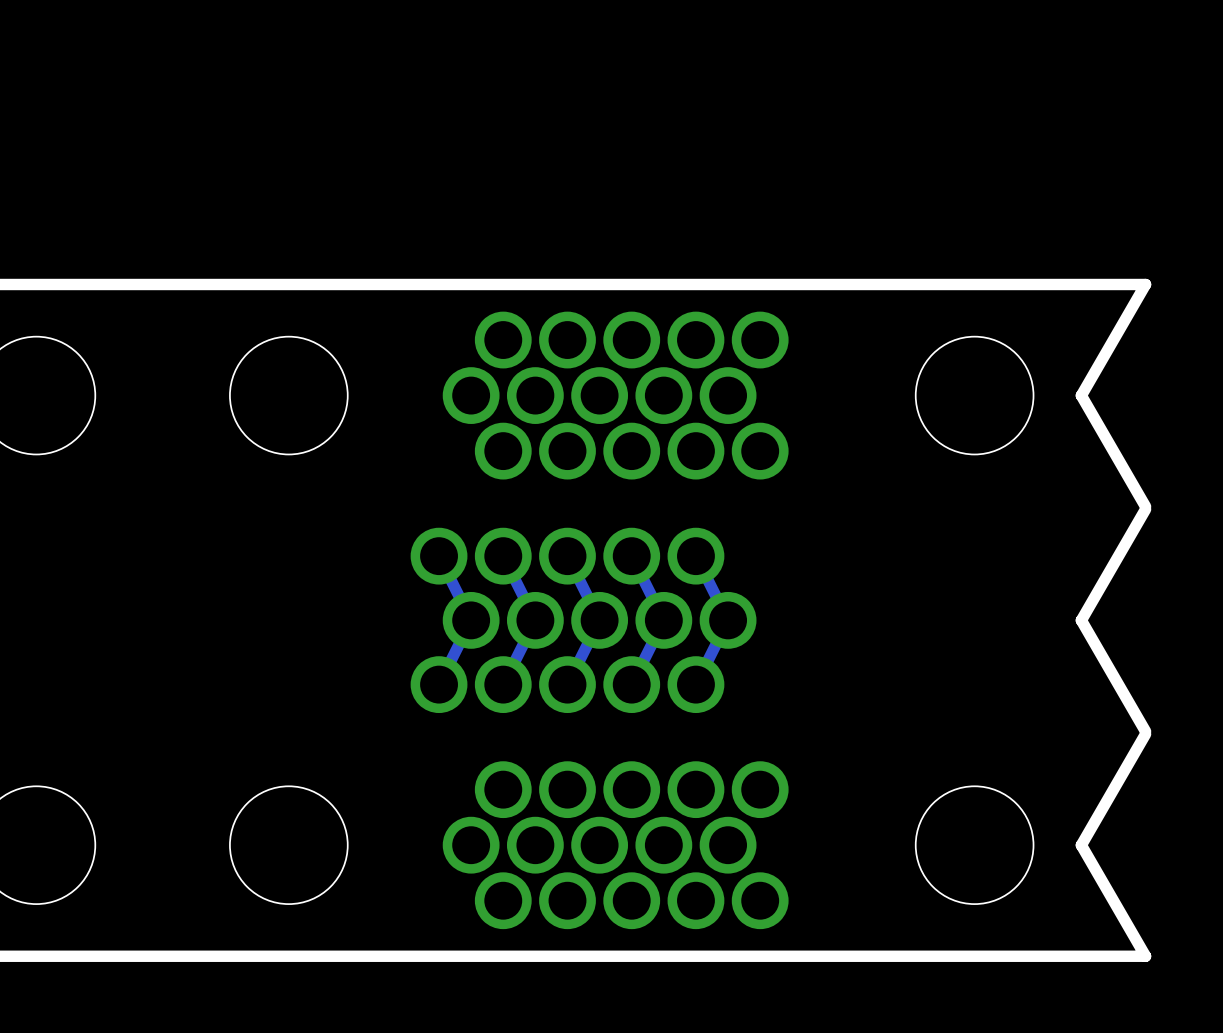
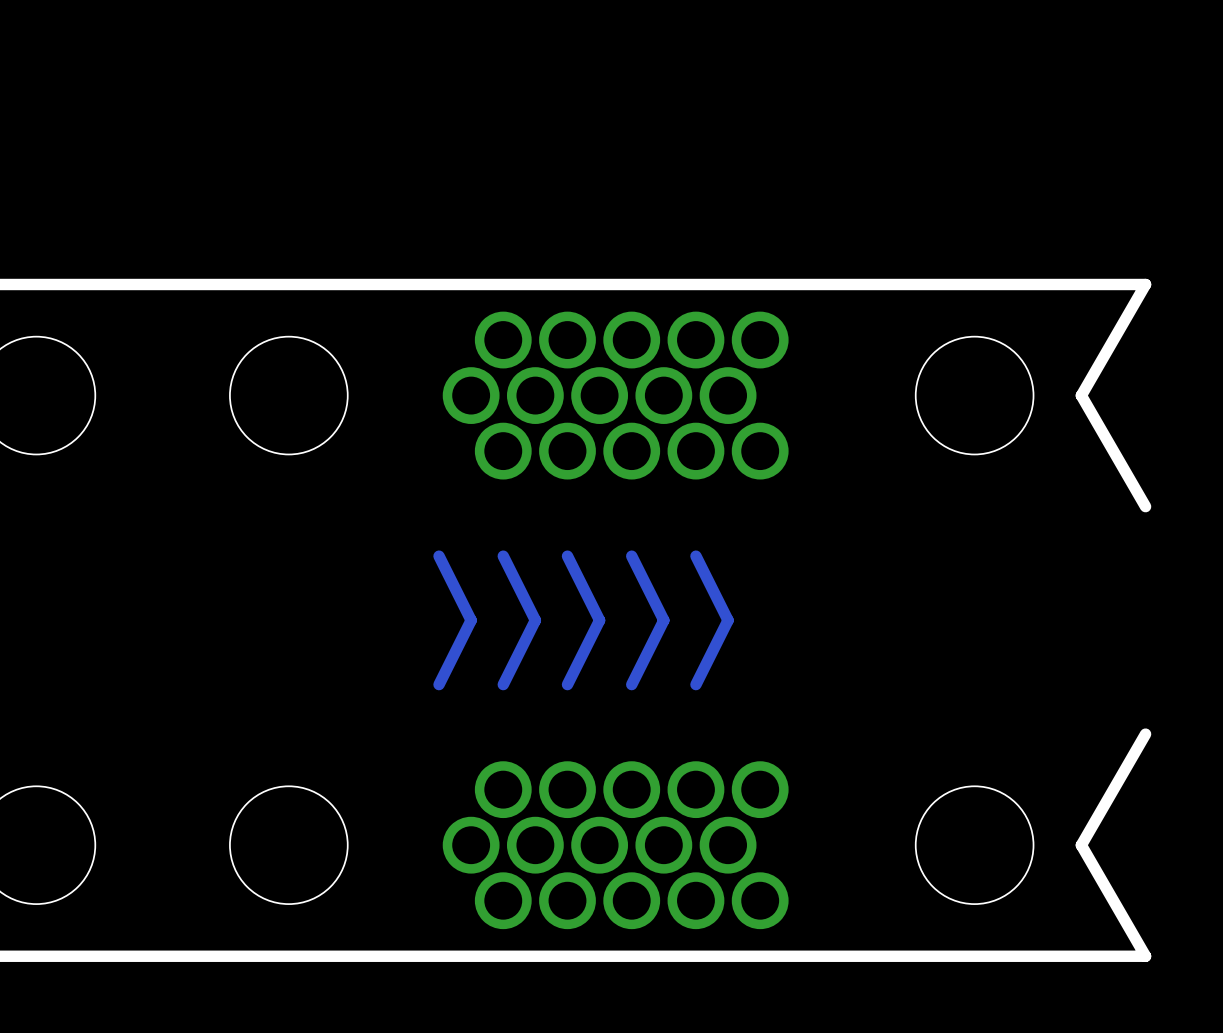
board edge: (1145, 509) (1081, 620) (1145, 731) -> none
via: (439, 556) -> none
via: (503, 556) -> none
via: (567, 556) -> none
via: (631, 556) -> none
via: (695, 556) -> none
via: (471, 620) -> none
via: (535, 620) -> none
via: (599, 620) -> none
via: (663, 620) -> none
via: (728, 620) -> none
via: (439, 684) -> none
via: (503, 684) -> none
via: (567, 684) -> none
via: (631, 684) -> none
via: (695, 684) -> none

